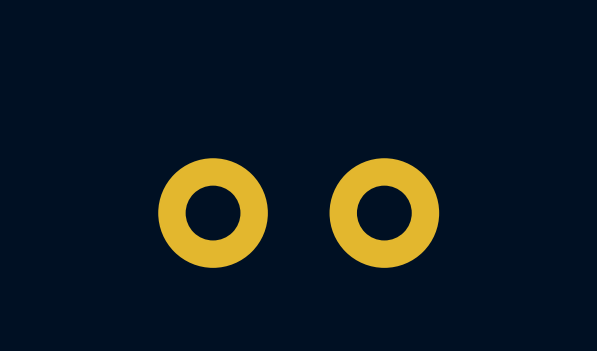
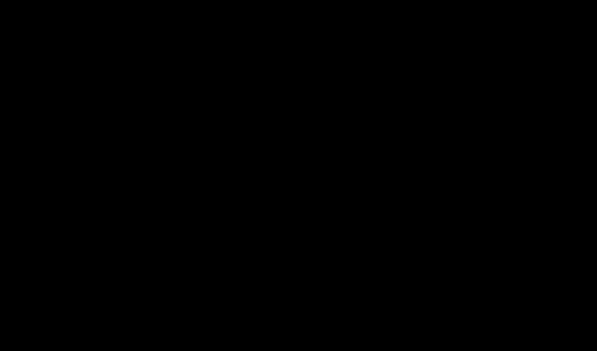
part: (298, 213) -> none

